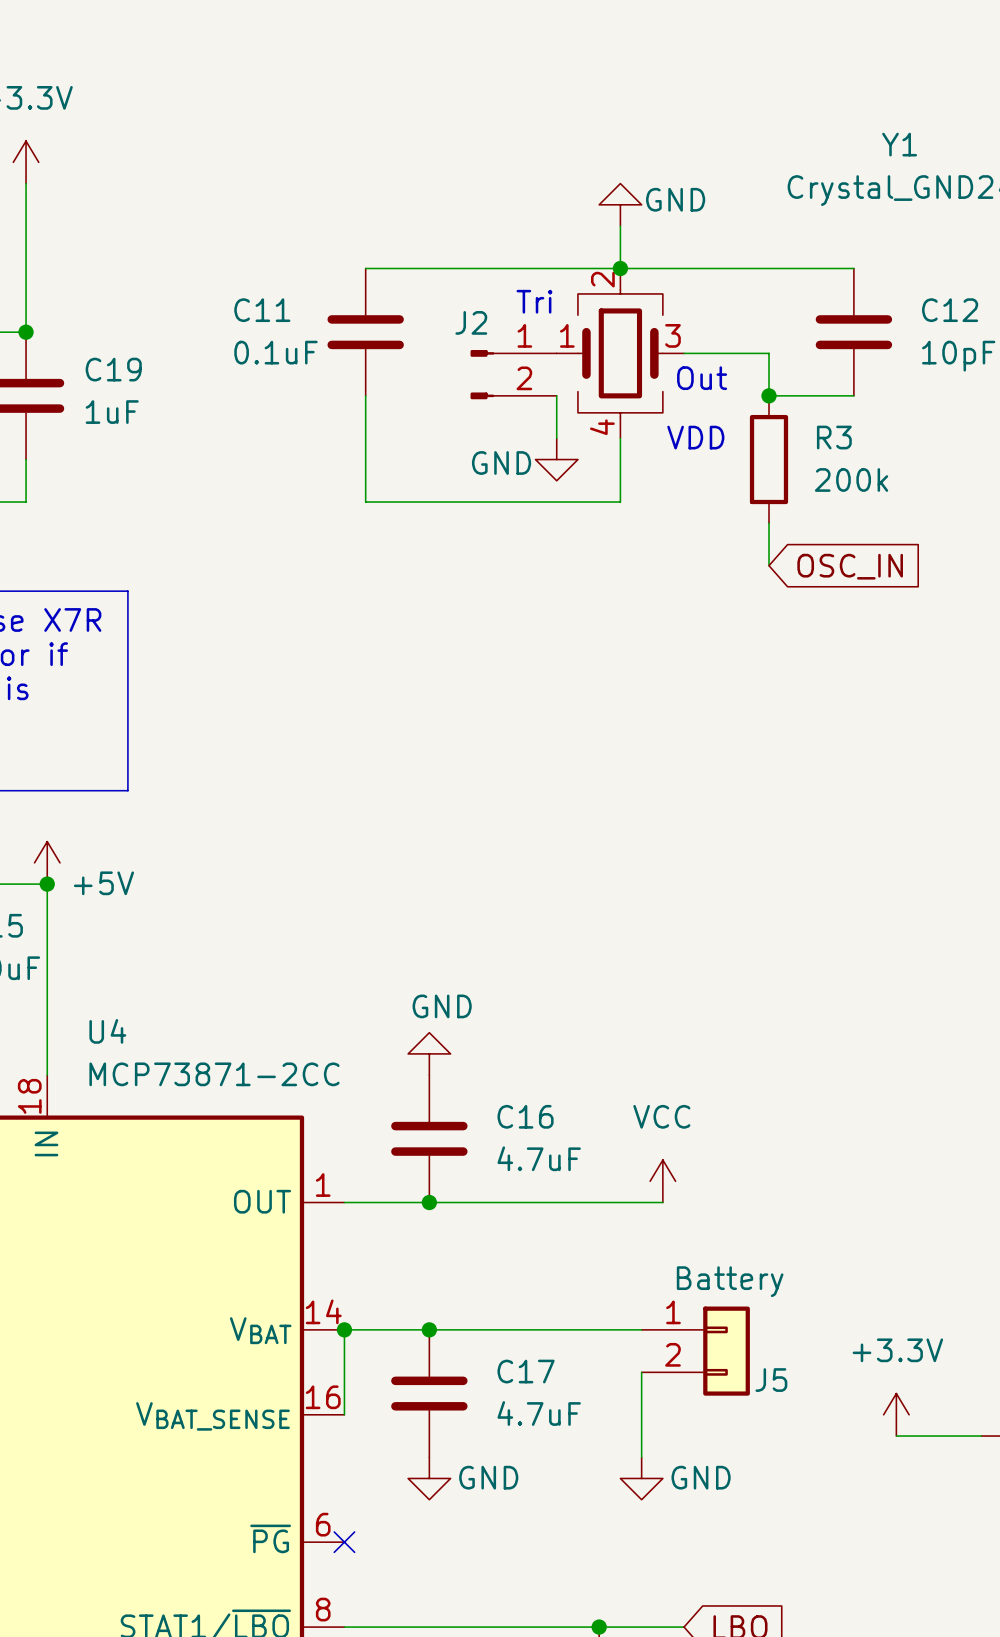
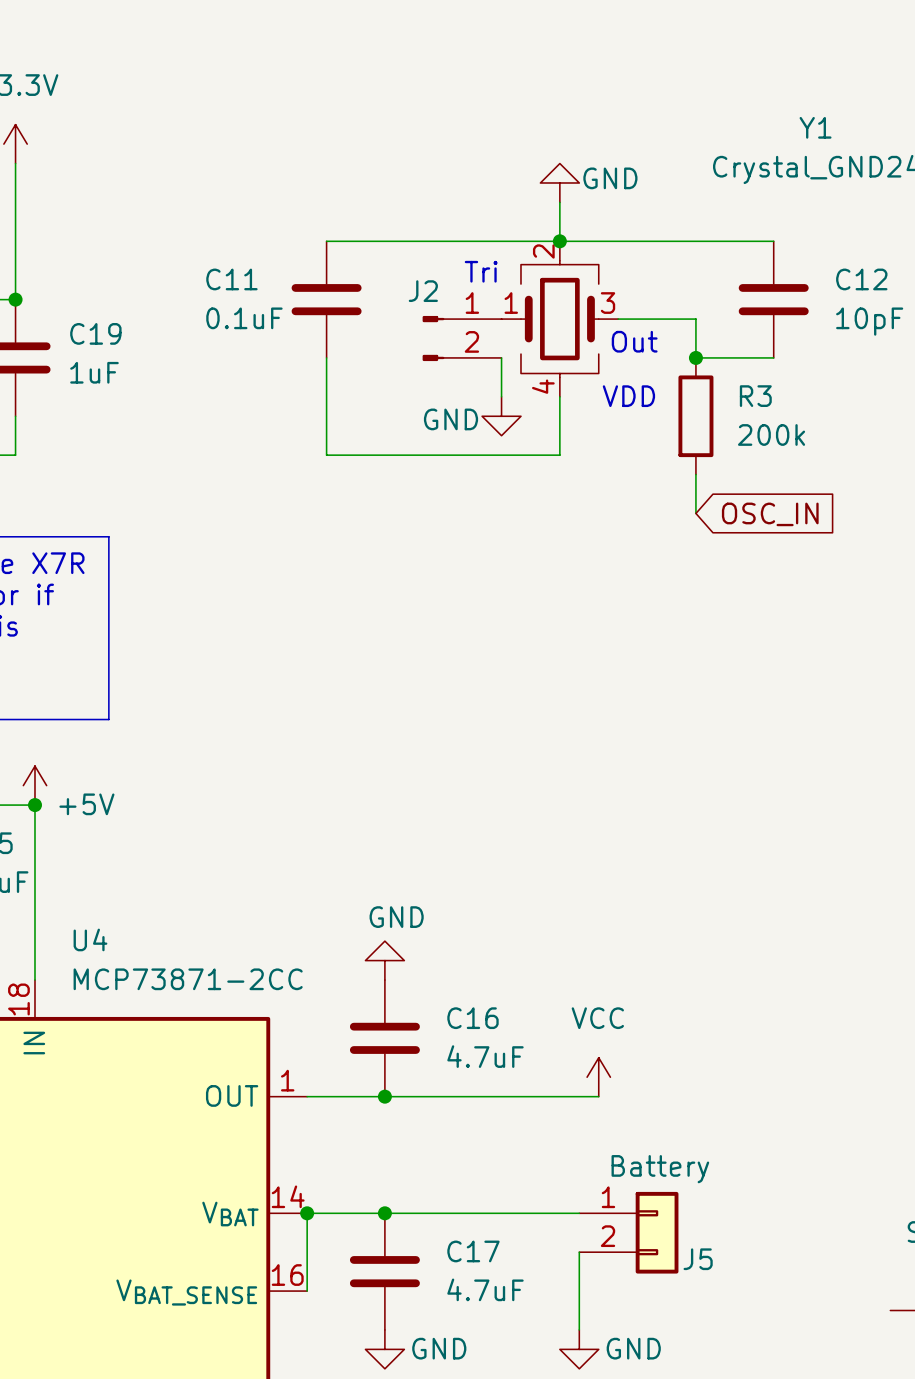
power symbol: +3.3V (896, 1414) -> none
wire: (896, 1436) (981, 1436) -> none

